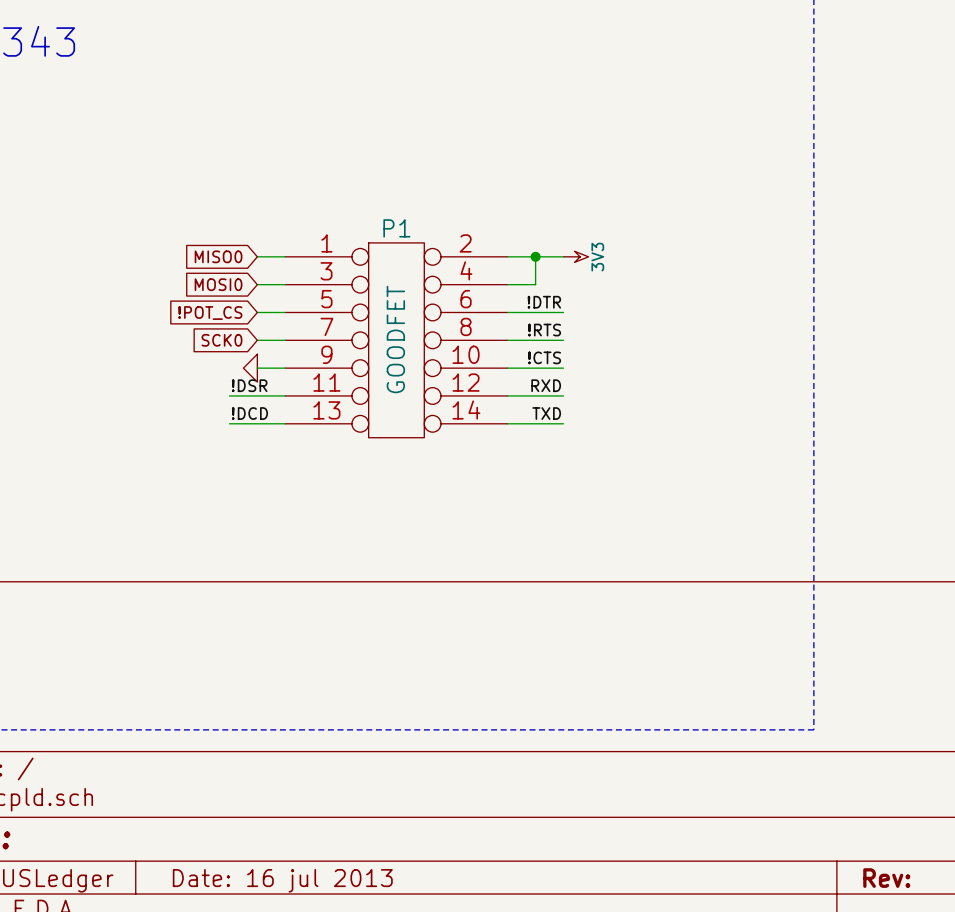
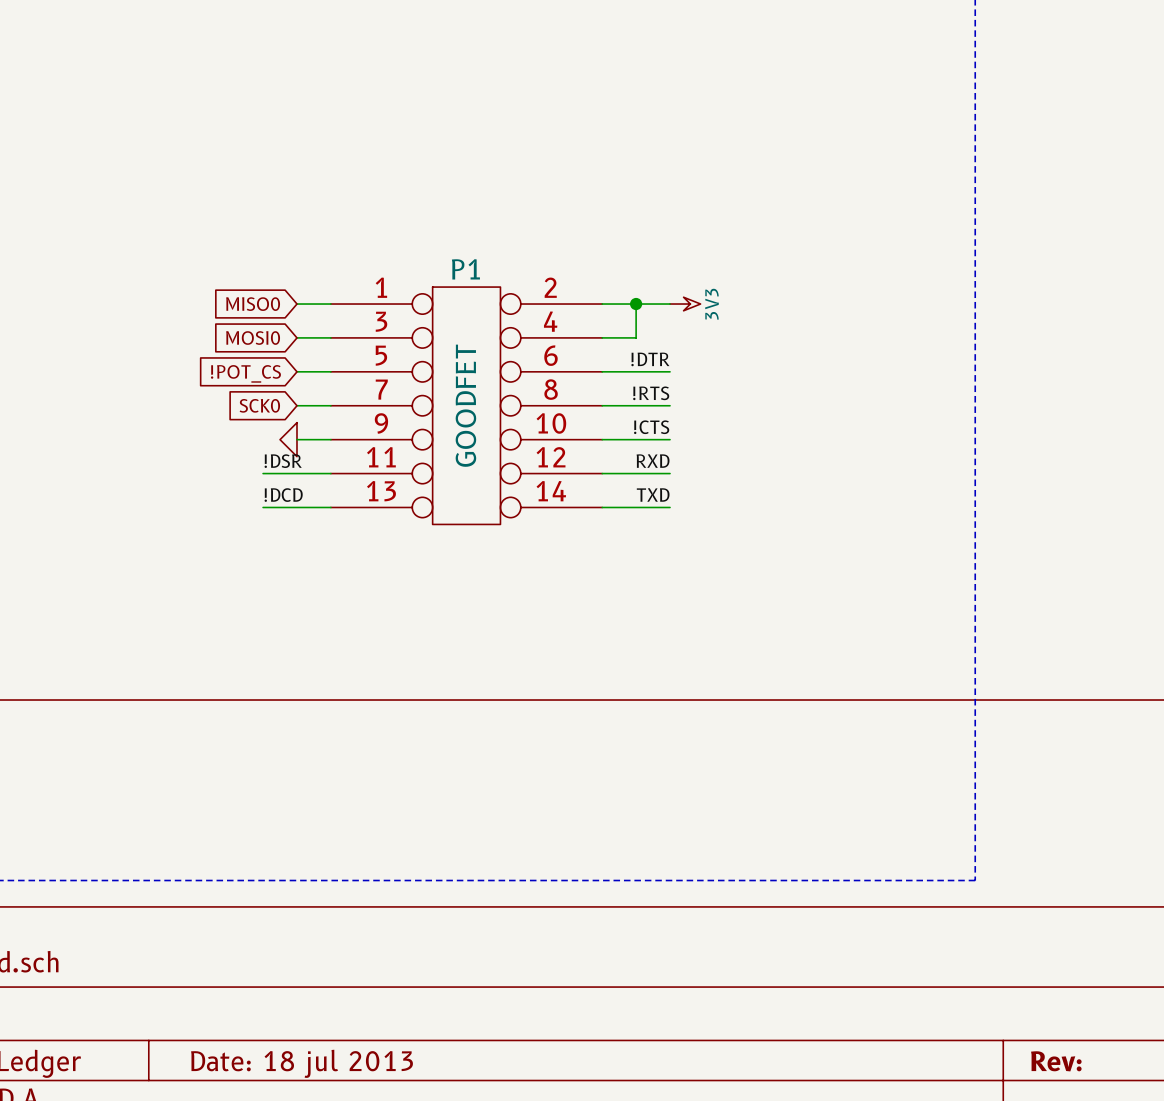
title block: Date: 16 jul 2013 (282, 880) -> Date: 18 jul 2013 (302, 1063)

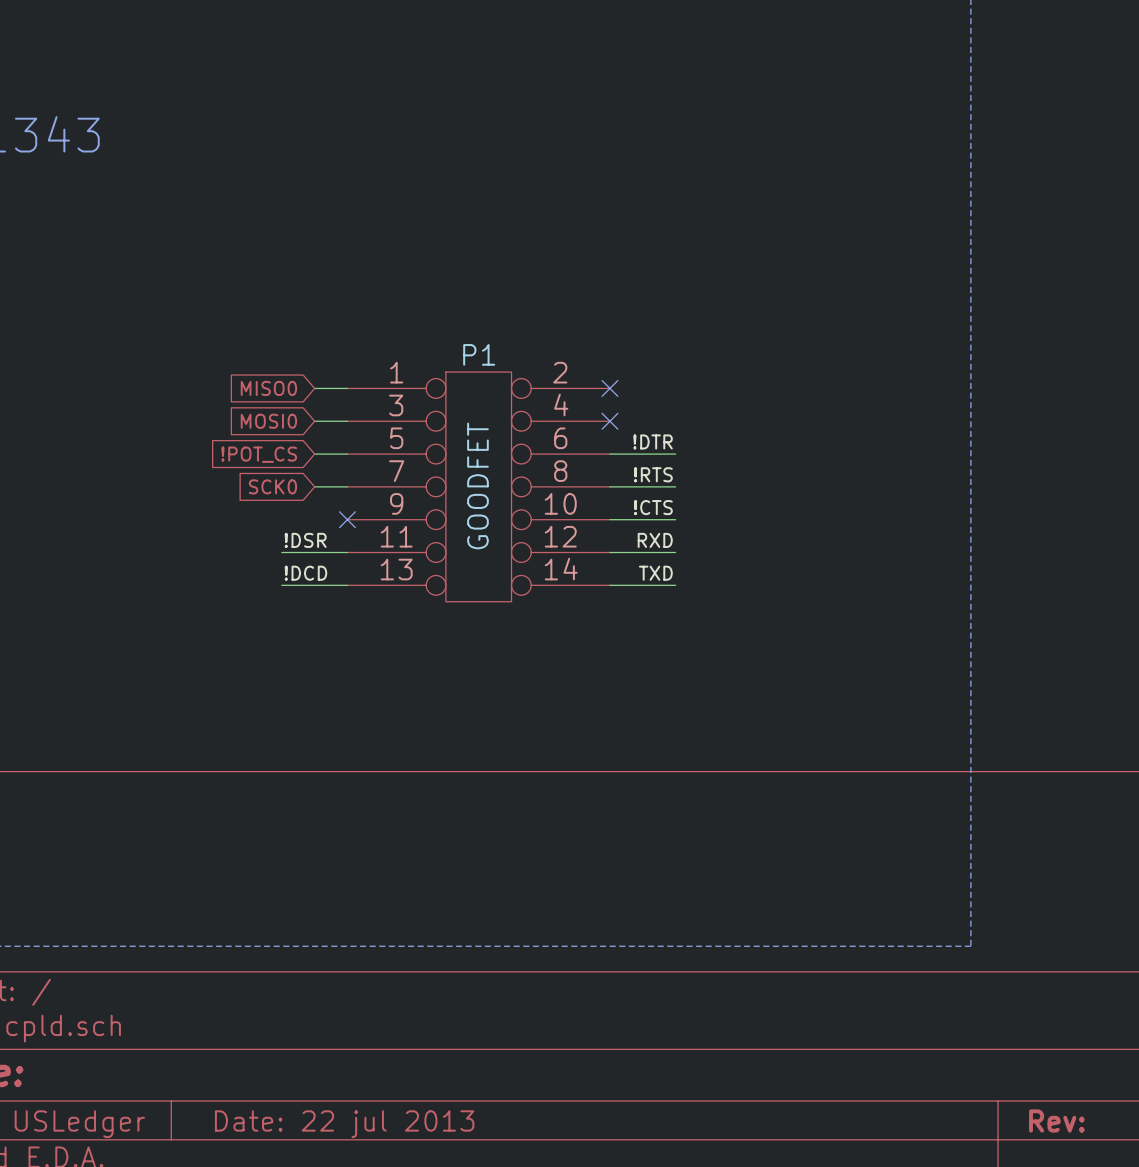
wire: (602, 304) (670, 304) -> none
no-connect mark: none -> (609, 388)
wire: (636, 304) (636, 337) (602, 337) -> none
junction: (636, 304) -> none
power symbol: 3V3 (685, 304) -> none
no-connect mark: none -> (609, 421)
power symbol: (288, 439) -> none
wire: (296, 439) (330, 439) -> none
no-connect mark: none -> (347, 519)
title block: Date: 18 jul 2013 (302, 1063) -> Date: 22 jul 2013 (344, 1124)

